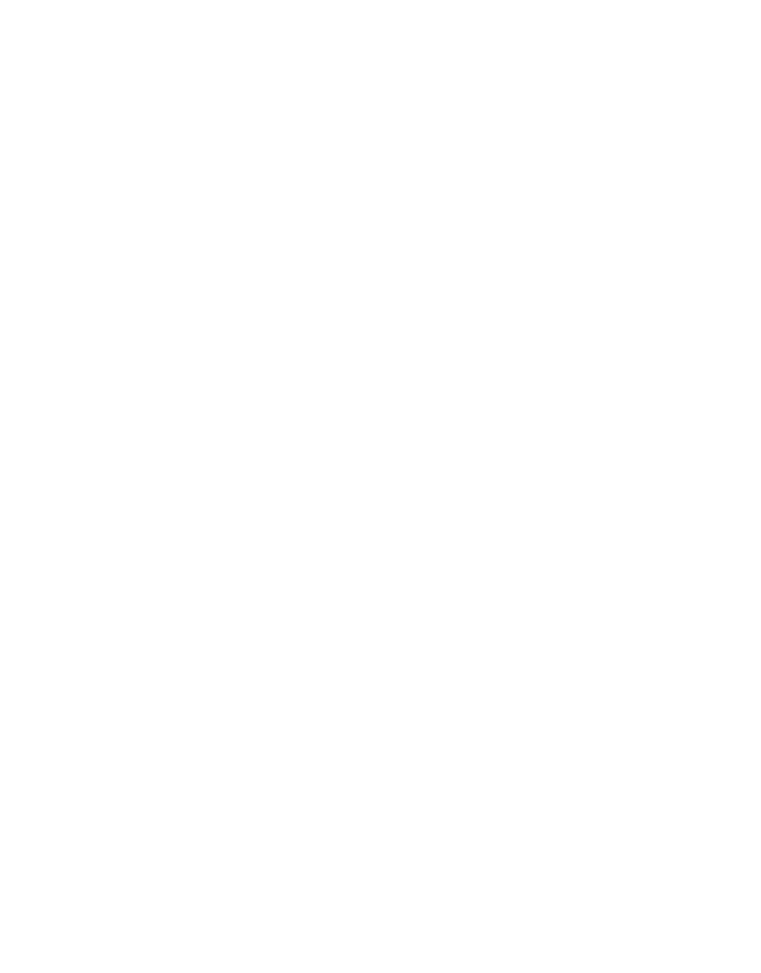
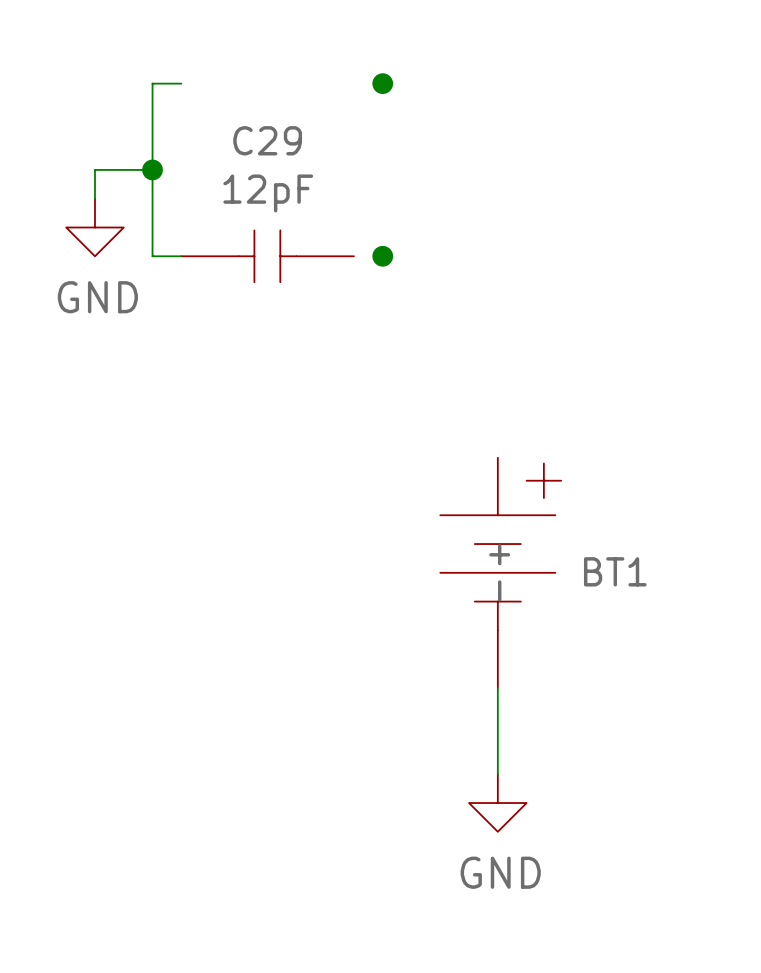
wire: none -> (181, 83) (152, 83) (152, 256) (181, 256)
junction: none -> (382, 83)
wire: none -> (152, 169) (94, 169) (94, 198)
junction: none -> (152, 169)
power symbol: none -> GND (94, 227)
C29: none -> 12pF (267, 256)
junction: none -> (382, 256)
BT1: none -> (500, 572)
wire: none -> (497, 687) (497, 774)
power symbol: none -> GND (497, 803)

